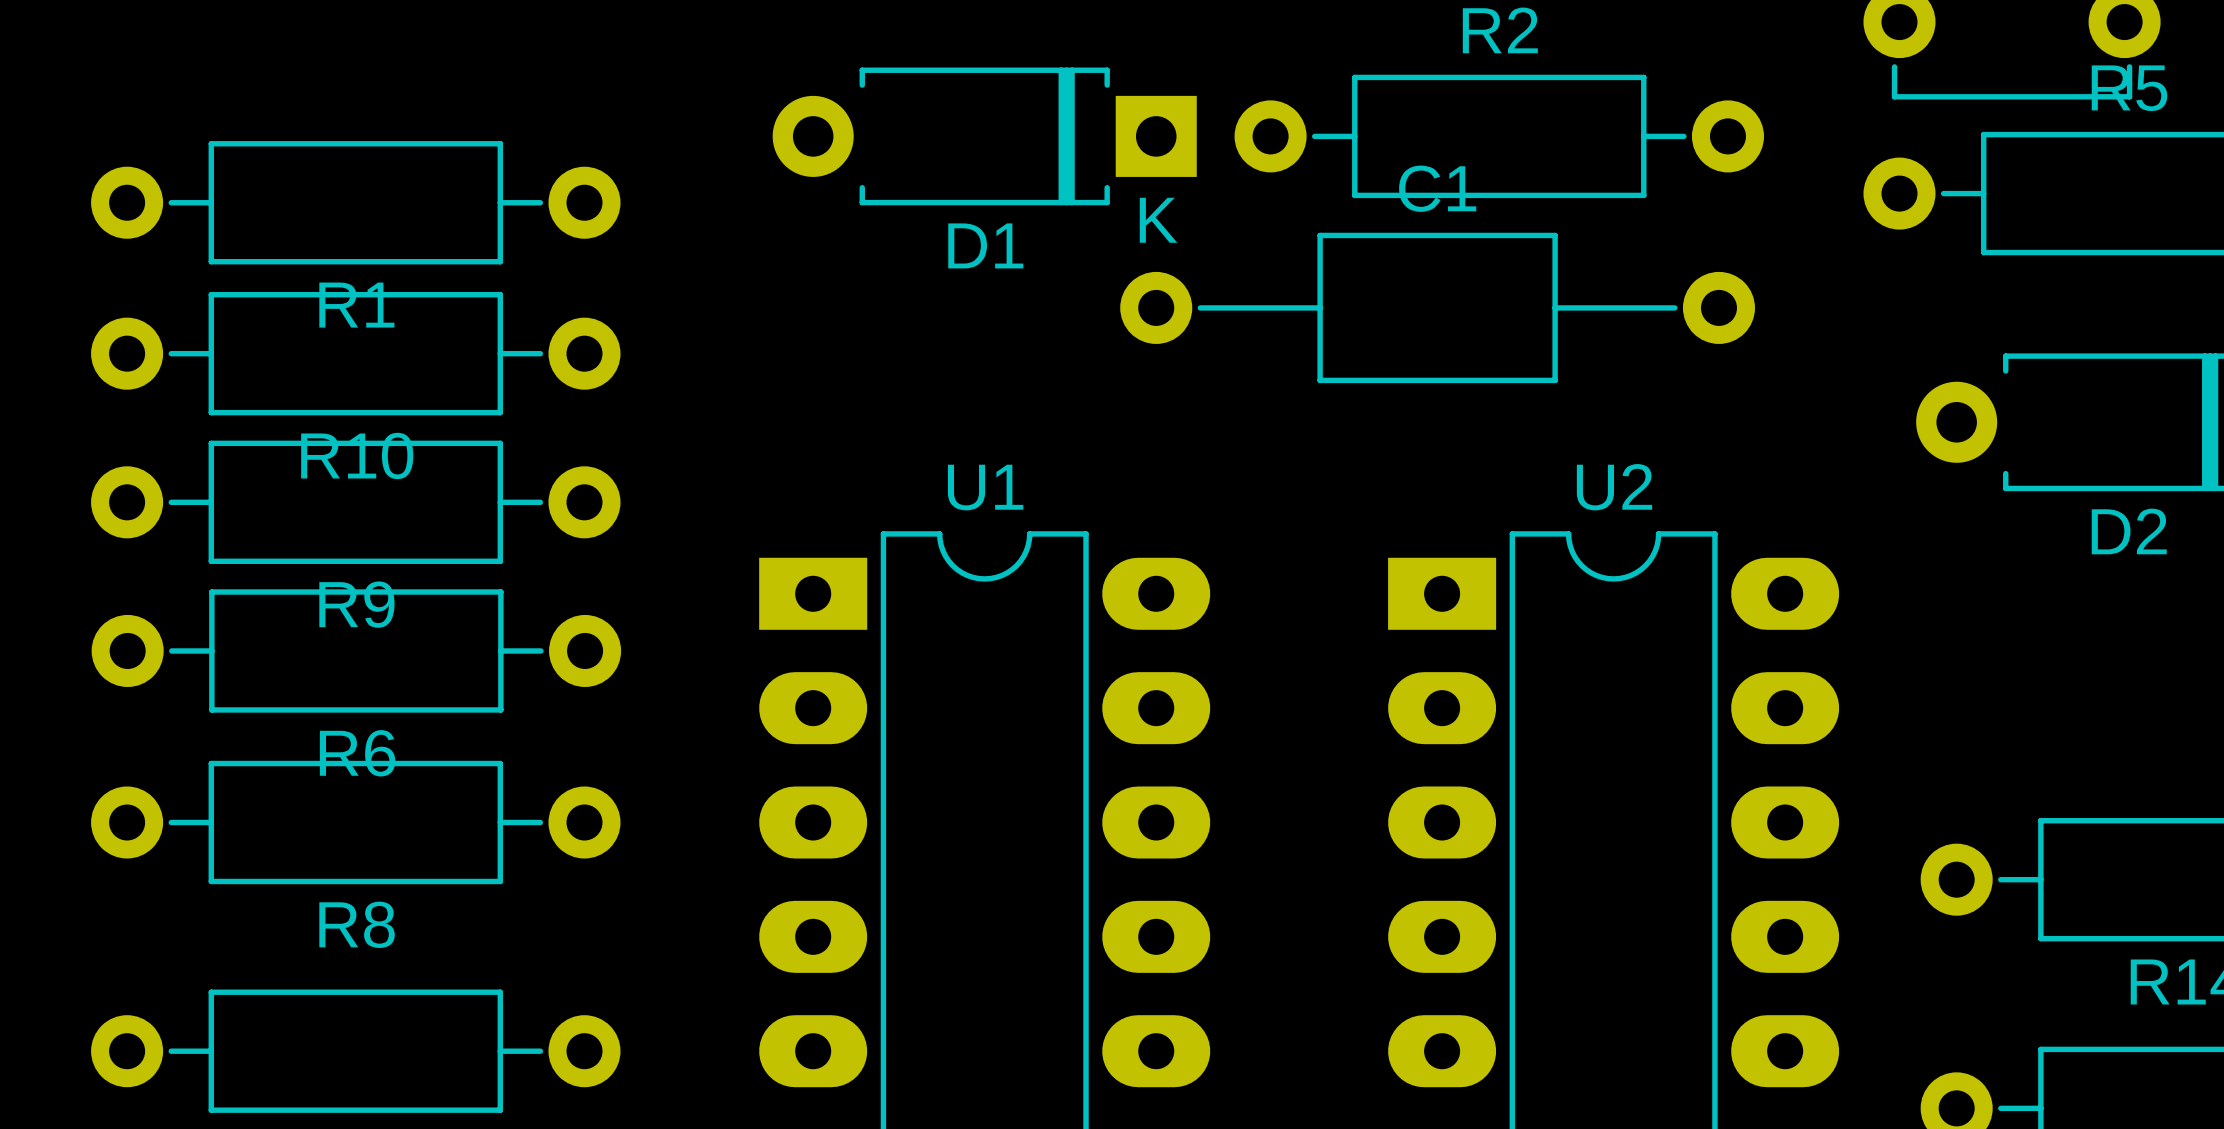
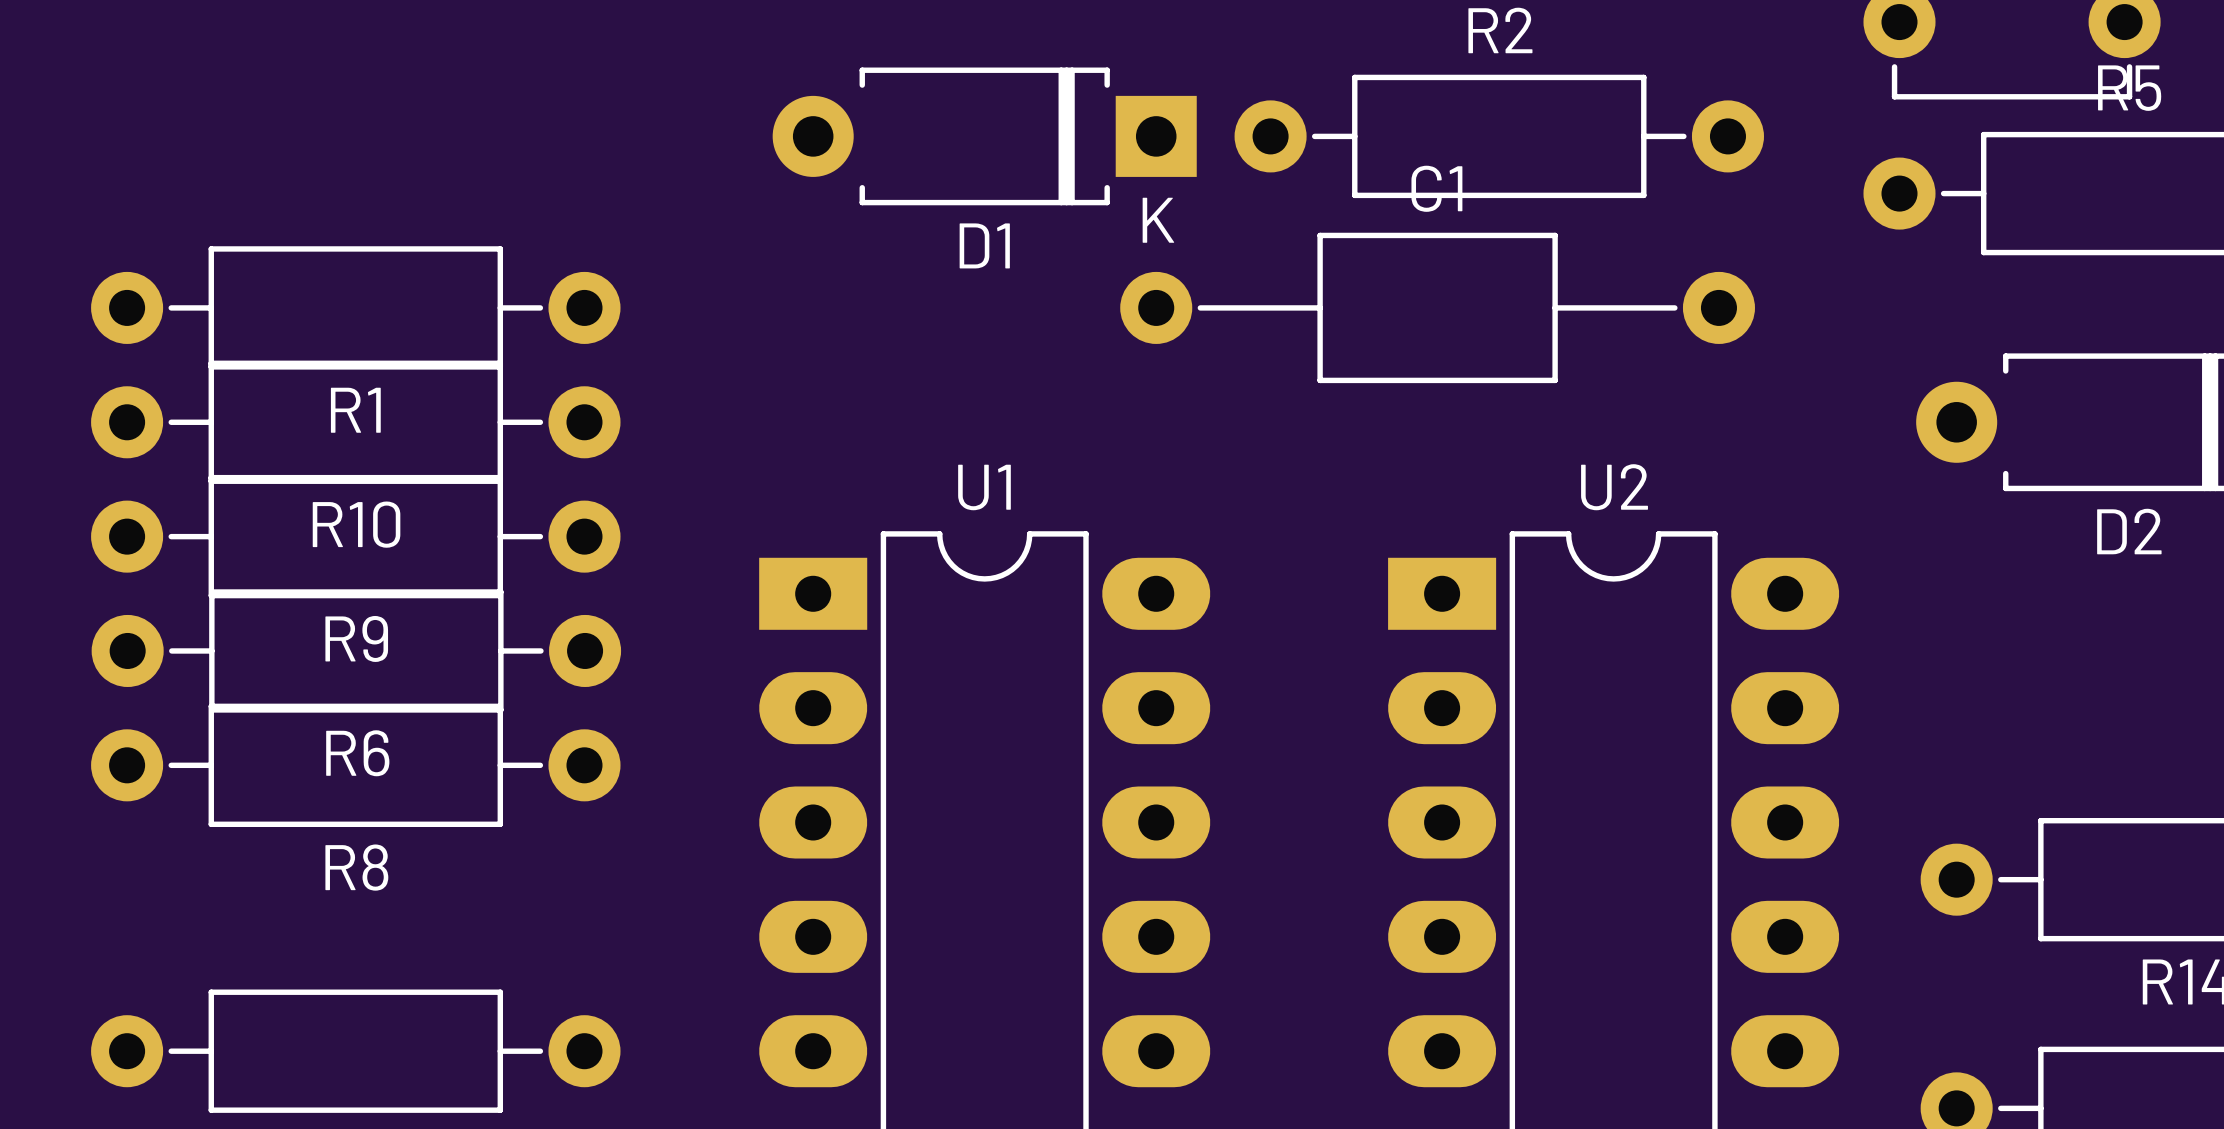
R1 position: (355, 202) -> (355, 307)
R10 position: (355, 353) -> (355, 422)
R9 position: (355, 502) -> (355, 536)
R8 position: (355, 822) -> (355, 765)

